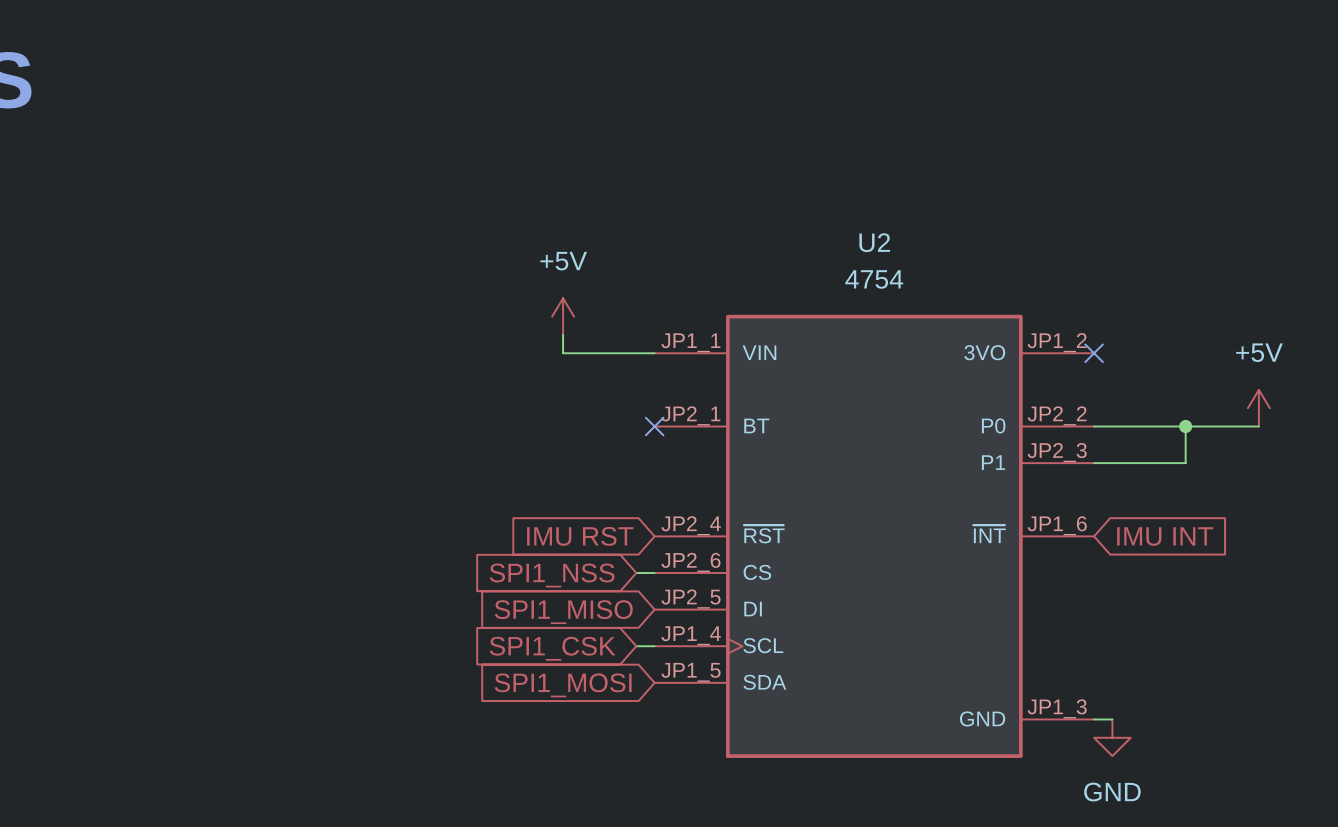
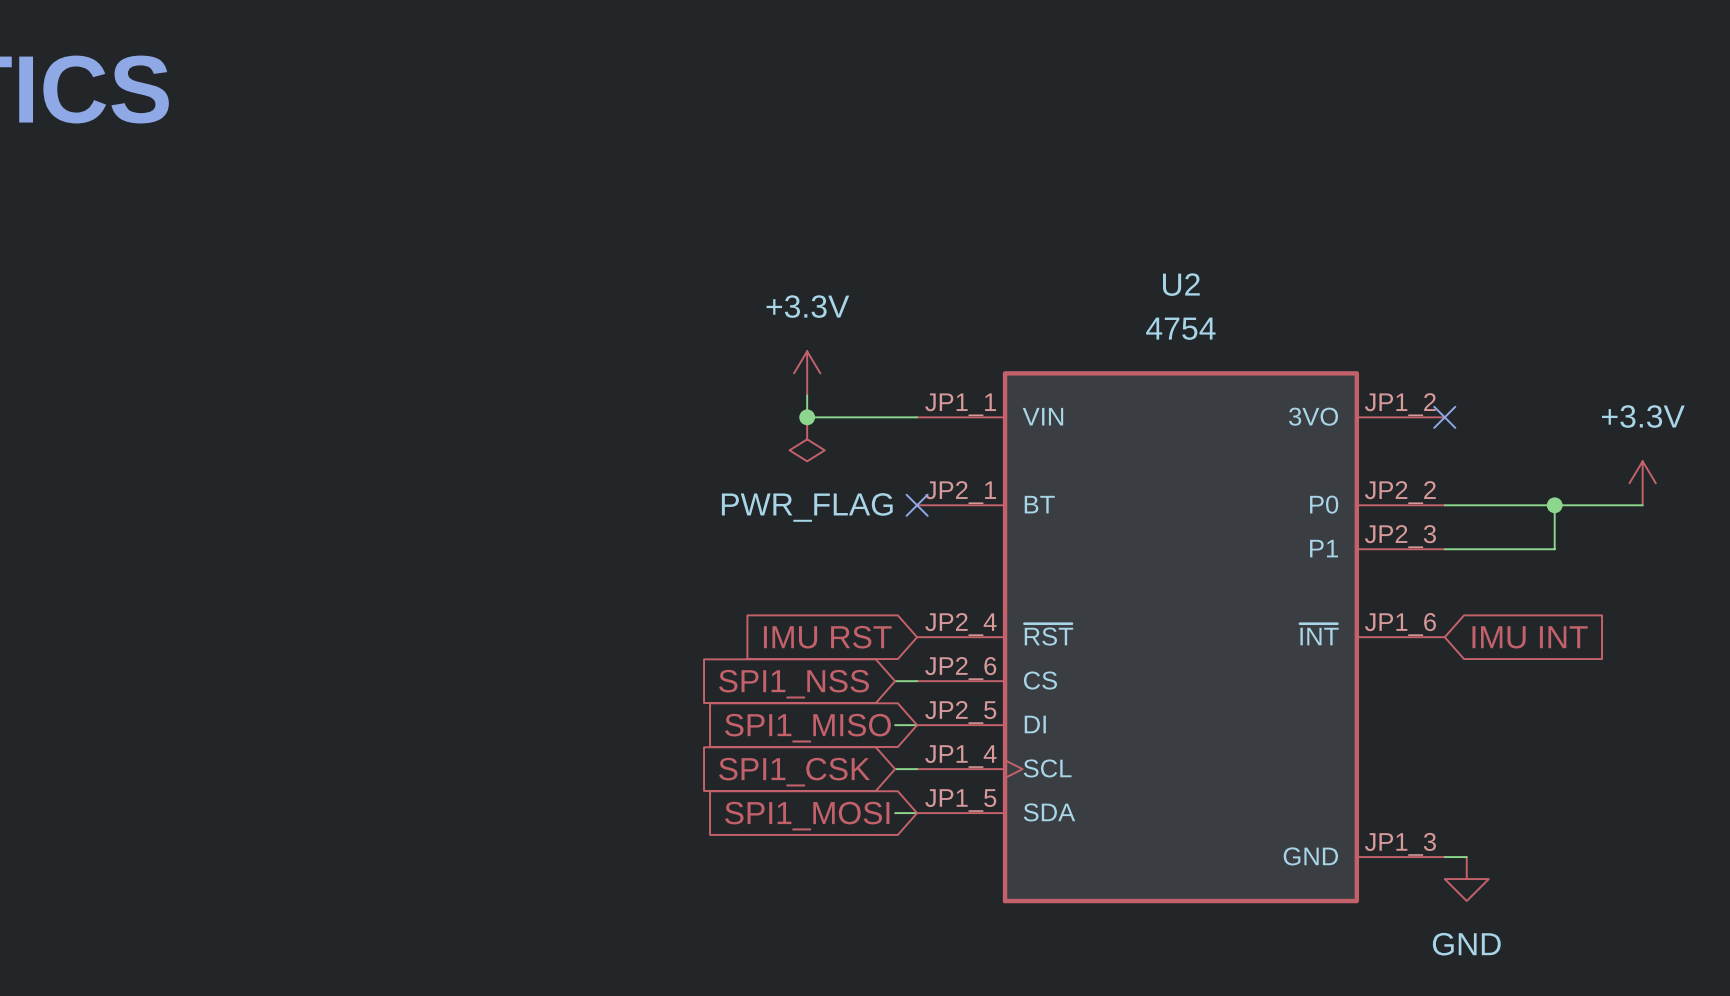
power symbol: +5V (563, 316) -> +3.3V (807, 373)
junction: none -> (807, 417)
power symbol: none -> PWR_FLAG (807, 439)
power symbol: +5V (1258, 408) -> +3.3V (1642, 483)
wire: none -> (895, 725) (917, 725)
wire: none -> (895, 813) (917, 813)

